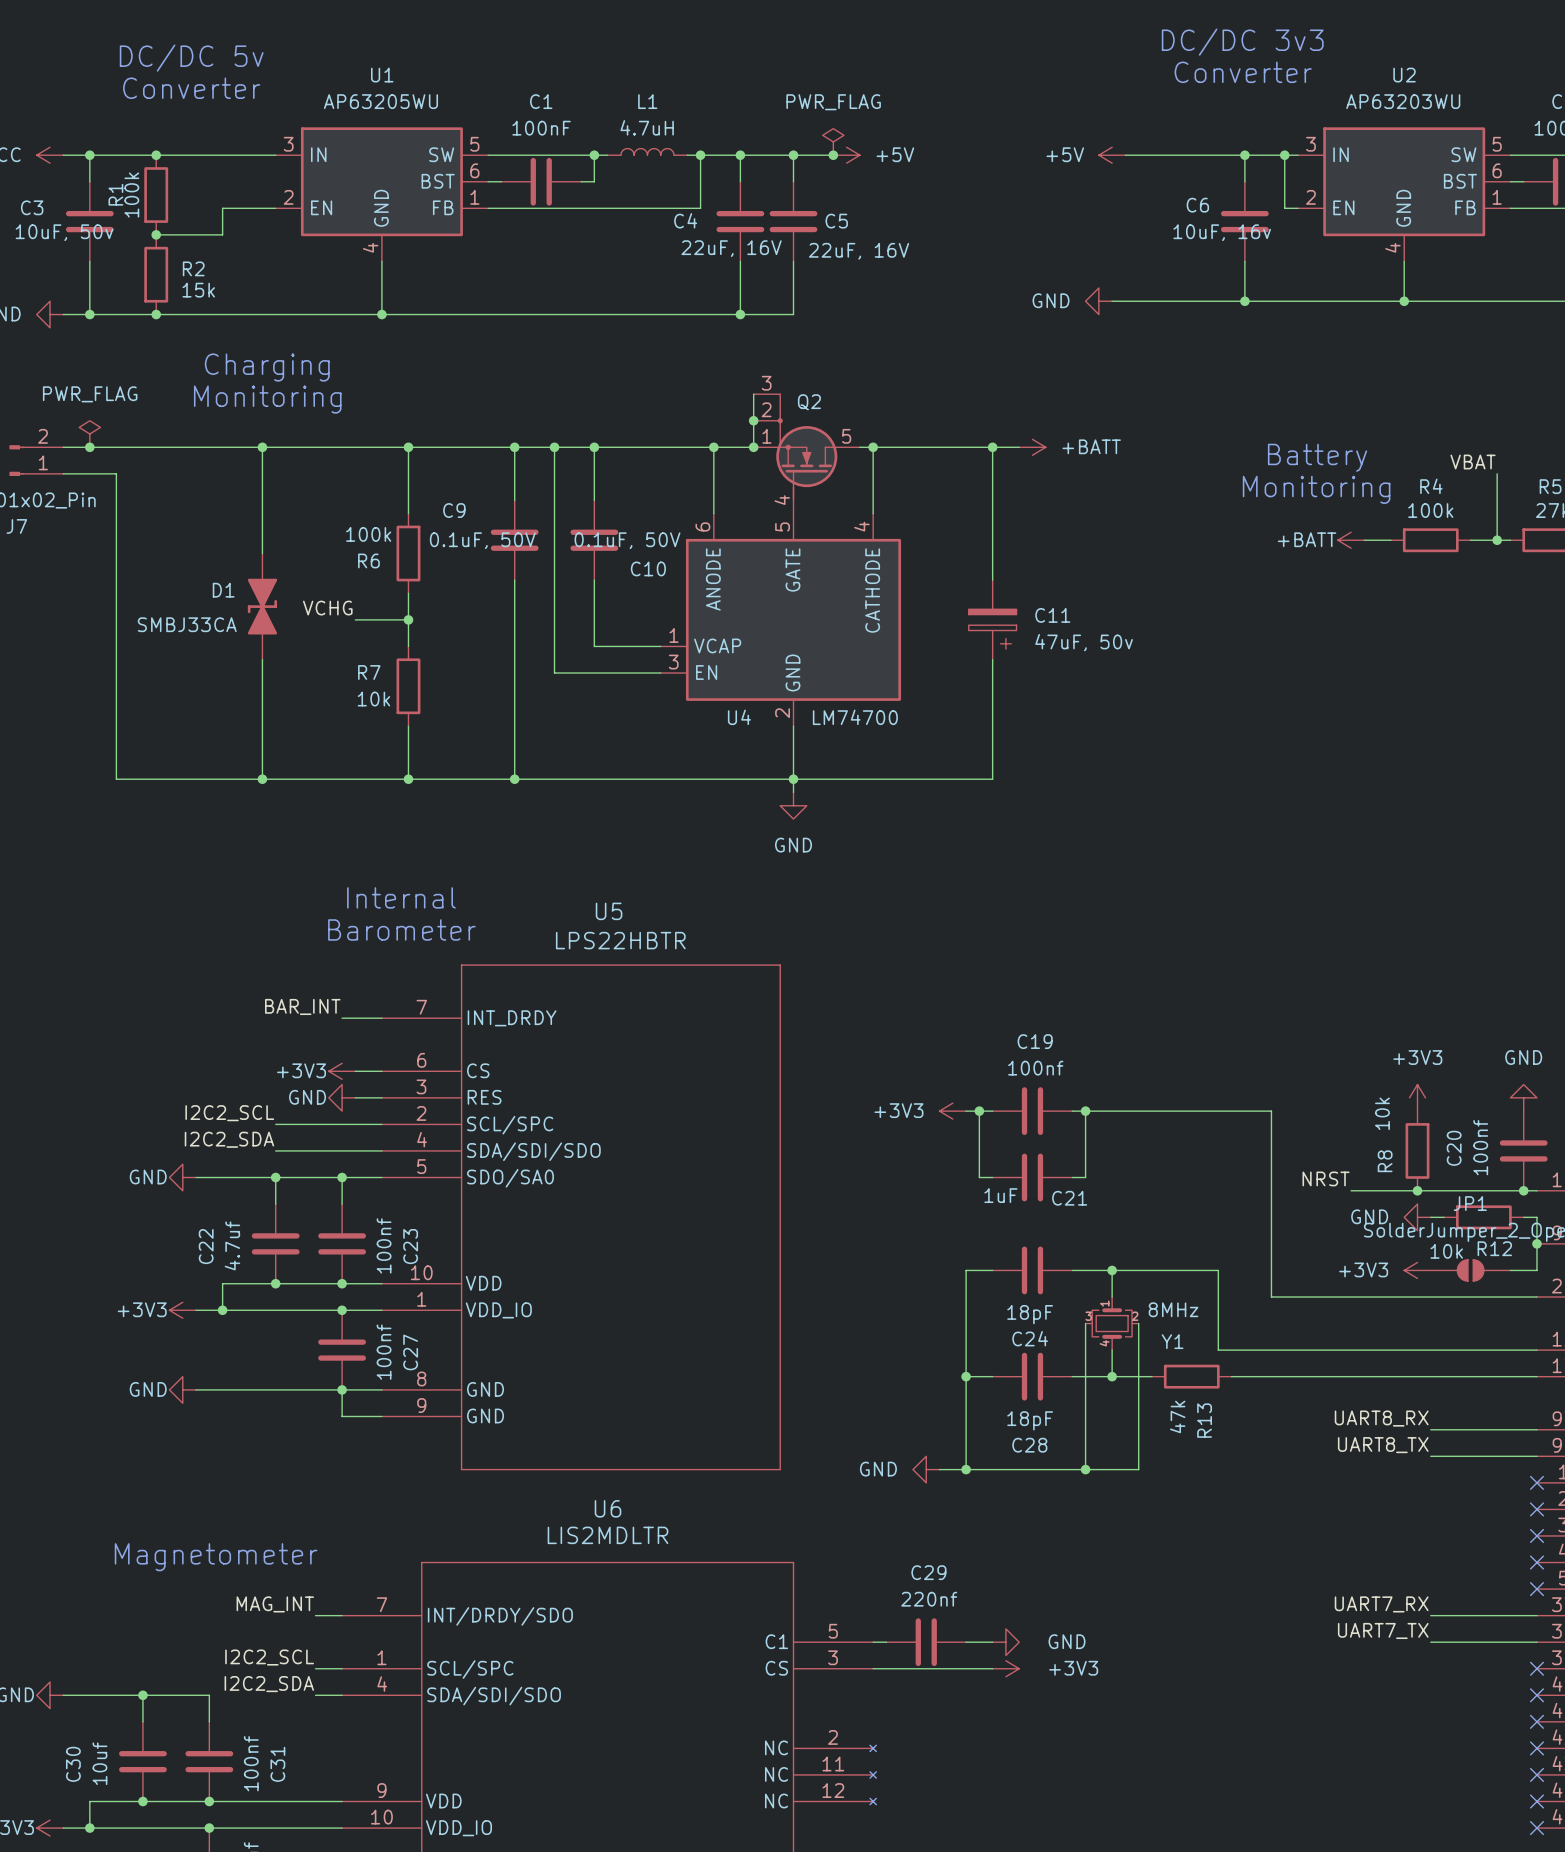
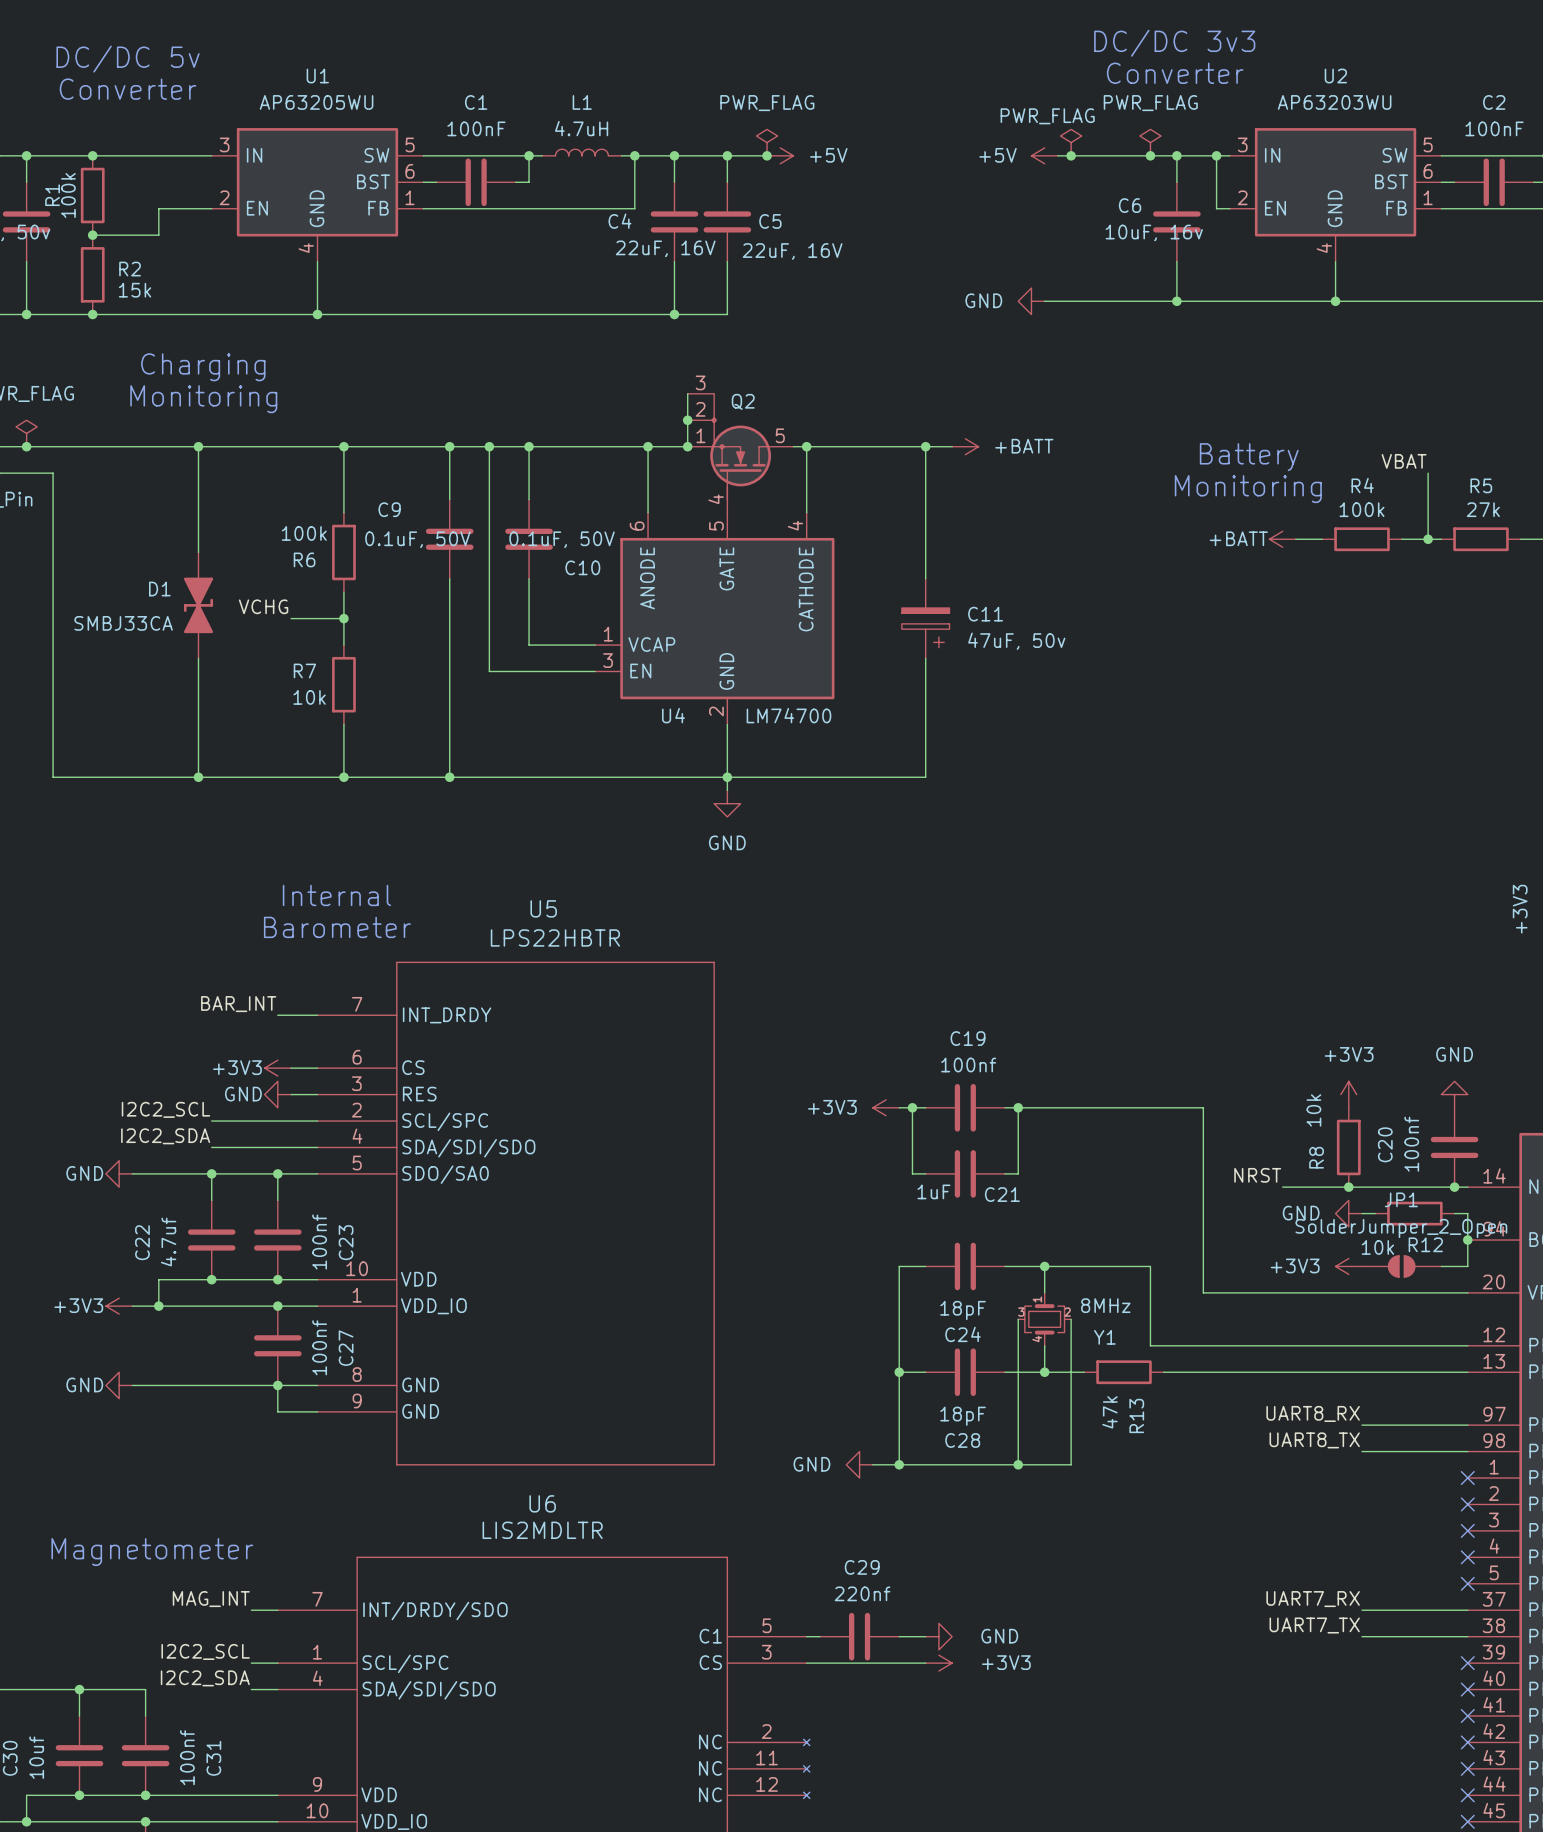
power symbol: none -> PWR_FLAG (1071, 142)
power symbol: none -> PWR_FLAG (1150, 142)
junction: none -> (1071, 155)
junction: none -> (1150, 155)

